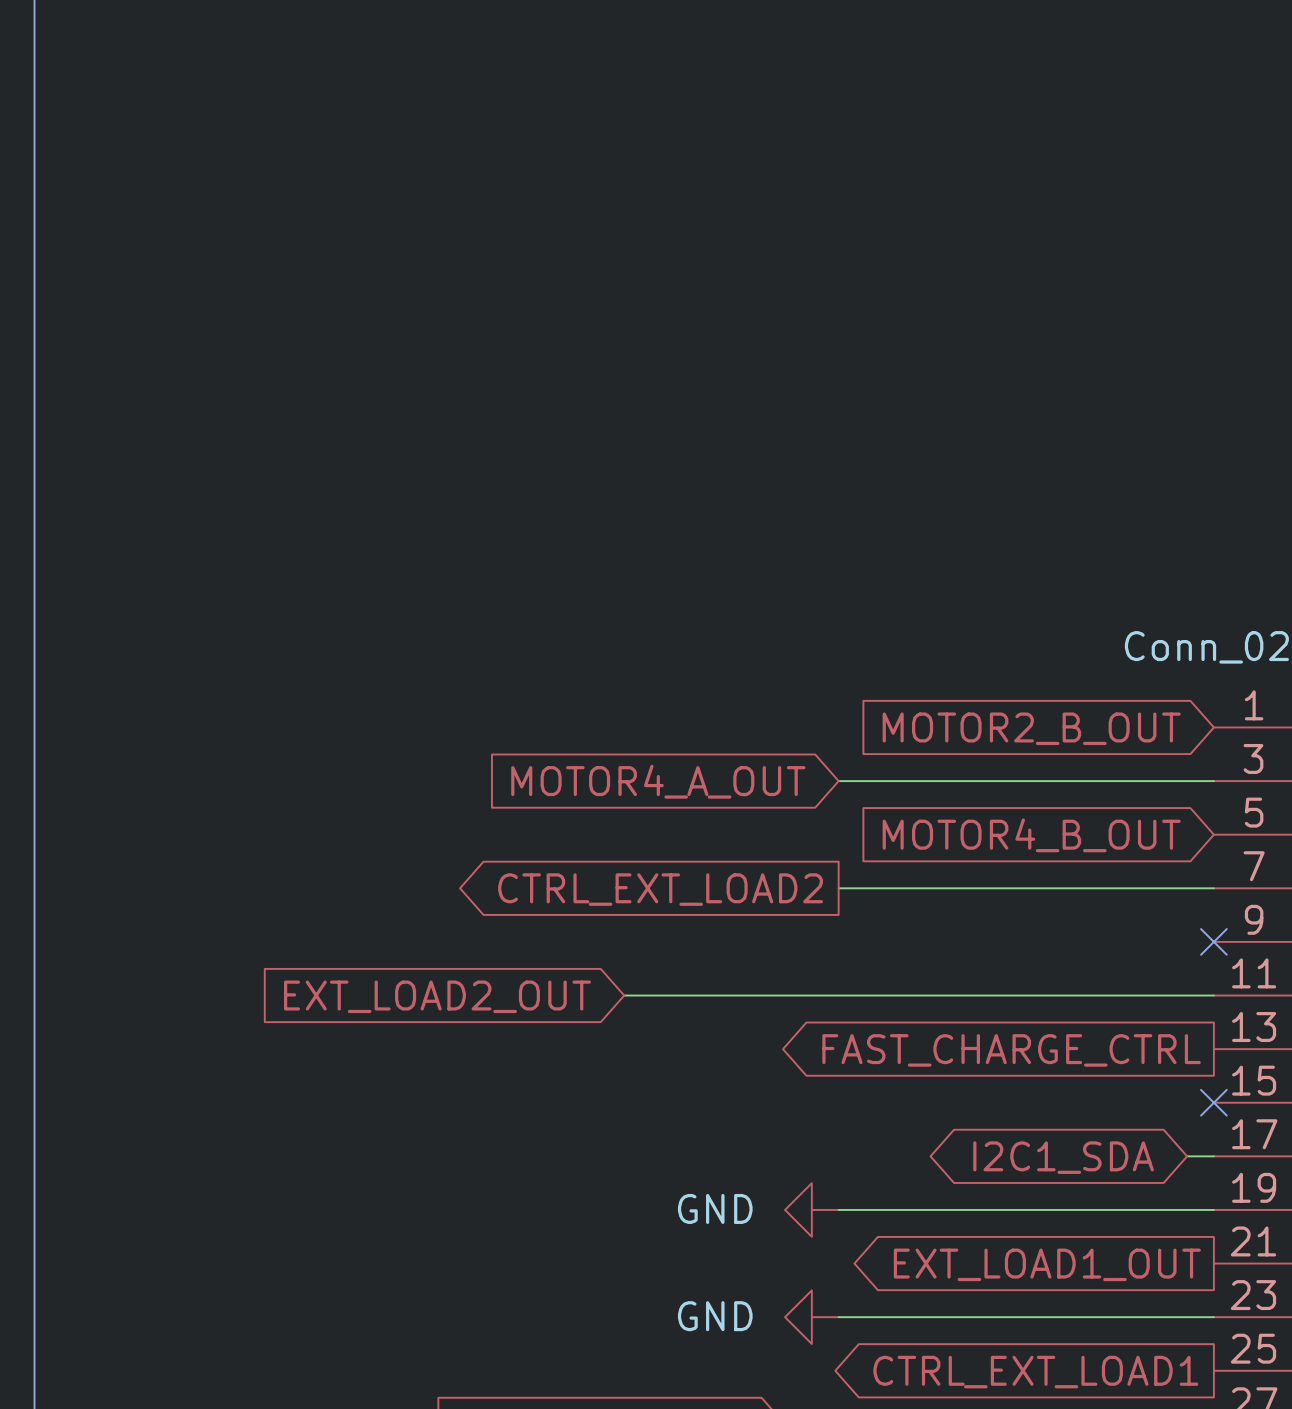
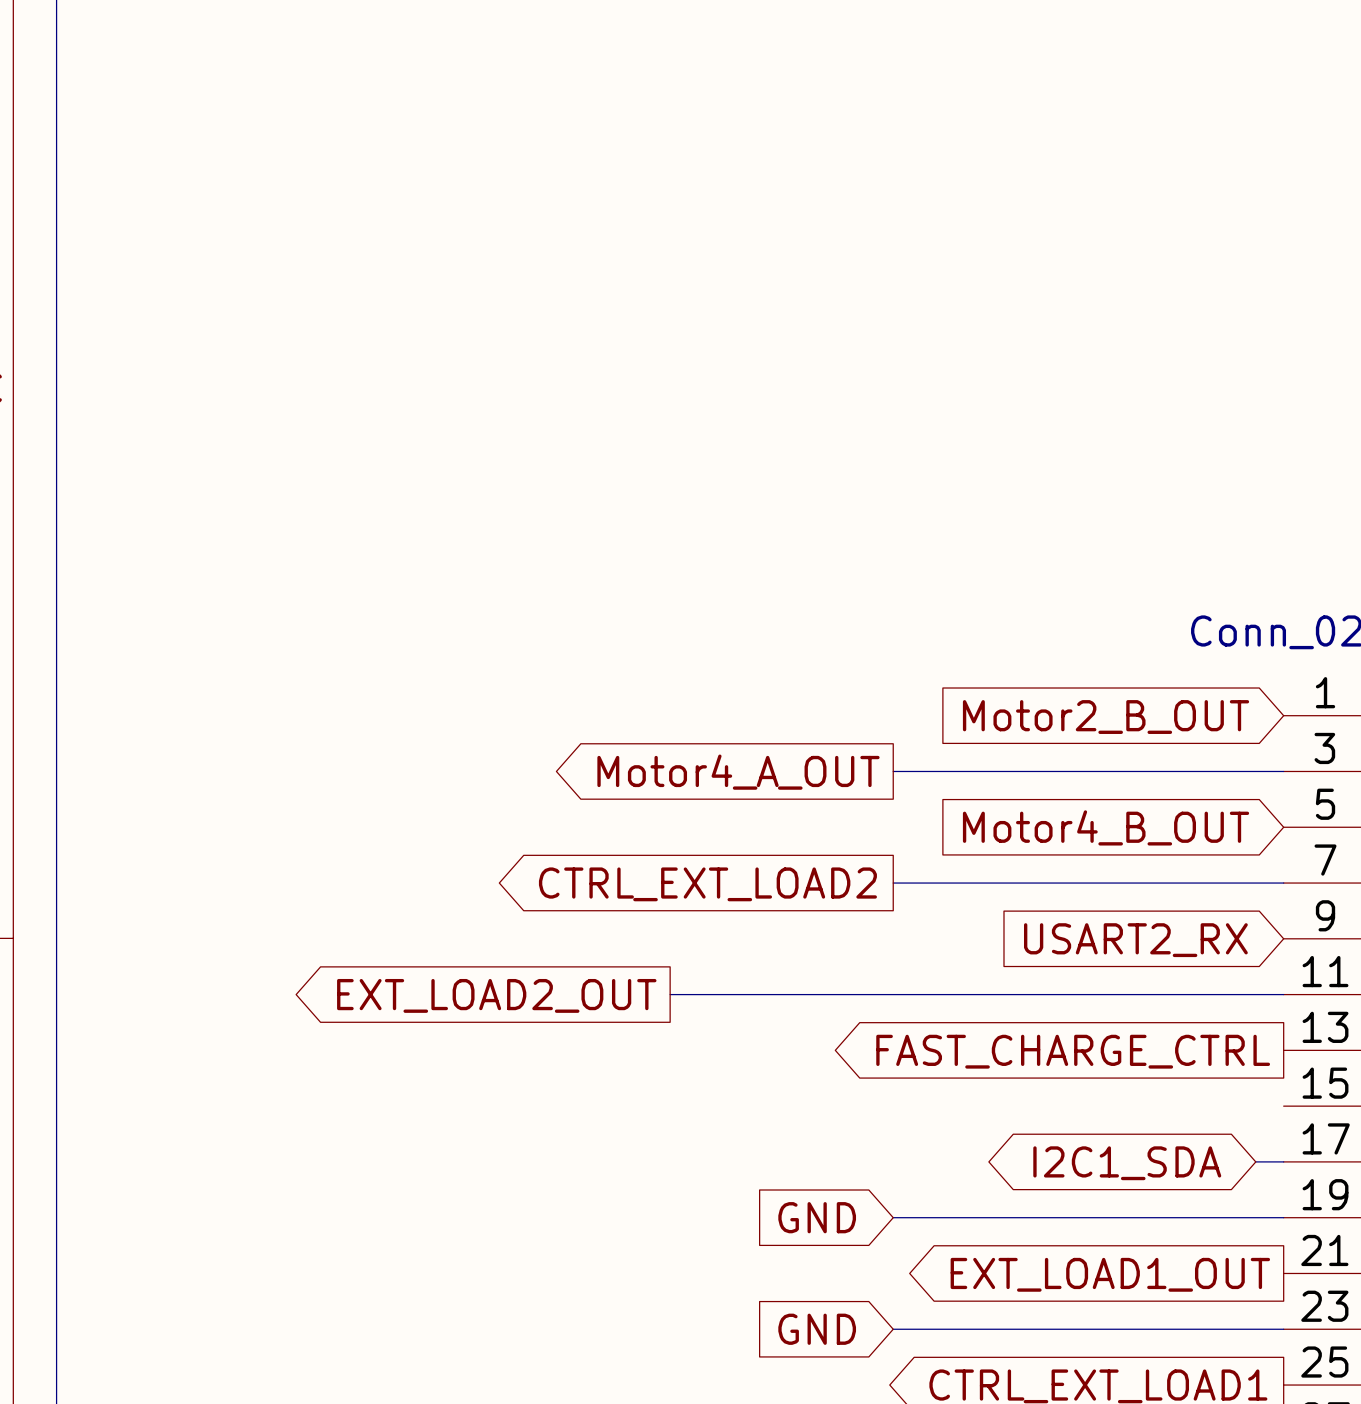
global label: MOTOR2_B_OUT (1031, 728) -> Motor2_B_OUT (1106, 717)
global label shape: input (658, 781) -> output (738, 772)
global label: MOTOR4_A_OUT (658, 781) -> Motor4_A_OUT (738, 772)
global label: MOTOR4_B_OUT (1031, 835) -> Motor4_B_OUT (1106, 827)
no-connect mark: (1213, 941) -> none
global label: none -> USART2_RX (1135, 940)
global label shape: input (437, 996) -> output (496, 995)
no-connect mark: (1213, 1102) -> none
global label: none -> GND (817, 1217)
power symbol: GND (811, 1209) -> none
global label: none -> GND (817, 1329)
power symbol: GND (811, 1317) -> none

